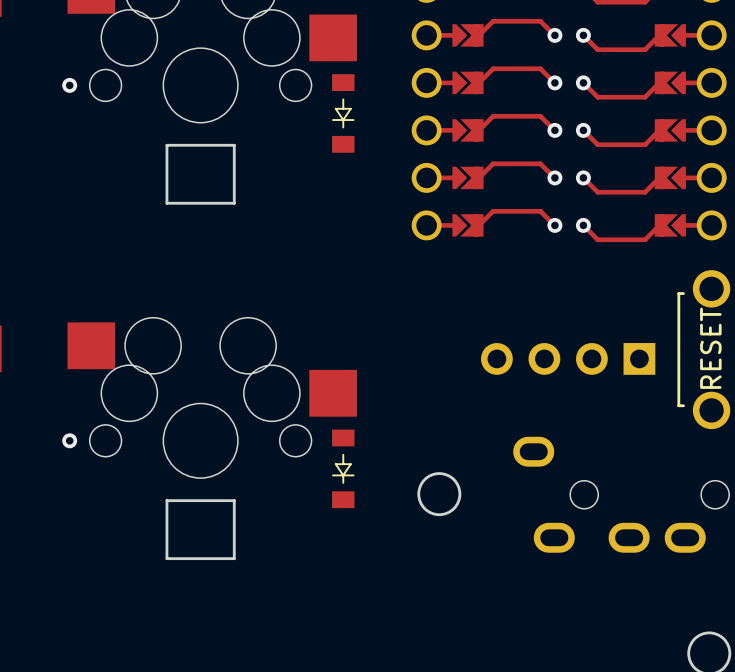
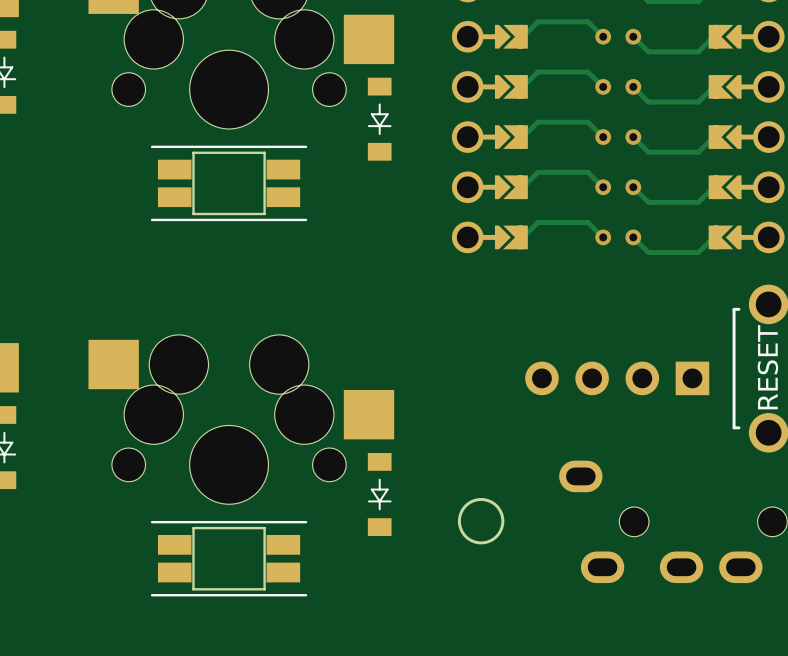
via: (69, 85) -> none
board edge: (166, 145) (166, 203) (234, 203) (234, 145) (166, 145) -> none
part: none -> (229, 183)
via: (69, 440) -> none
board edge: (166, 500) (234, 500) (234, 558) (166, 558) (166, 500) -> none
part: none -> (229, 558)

